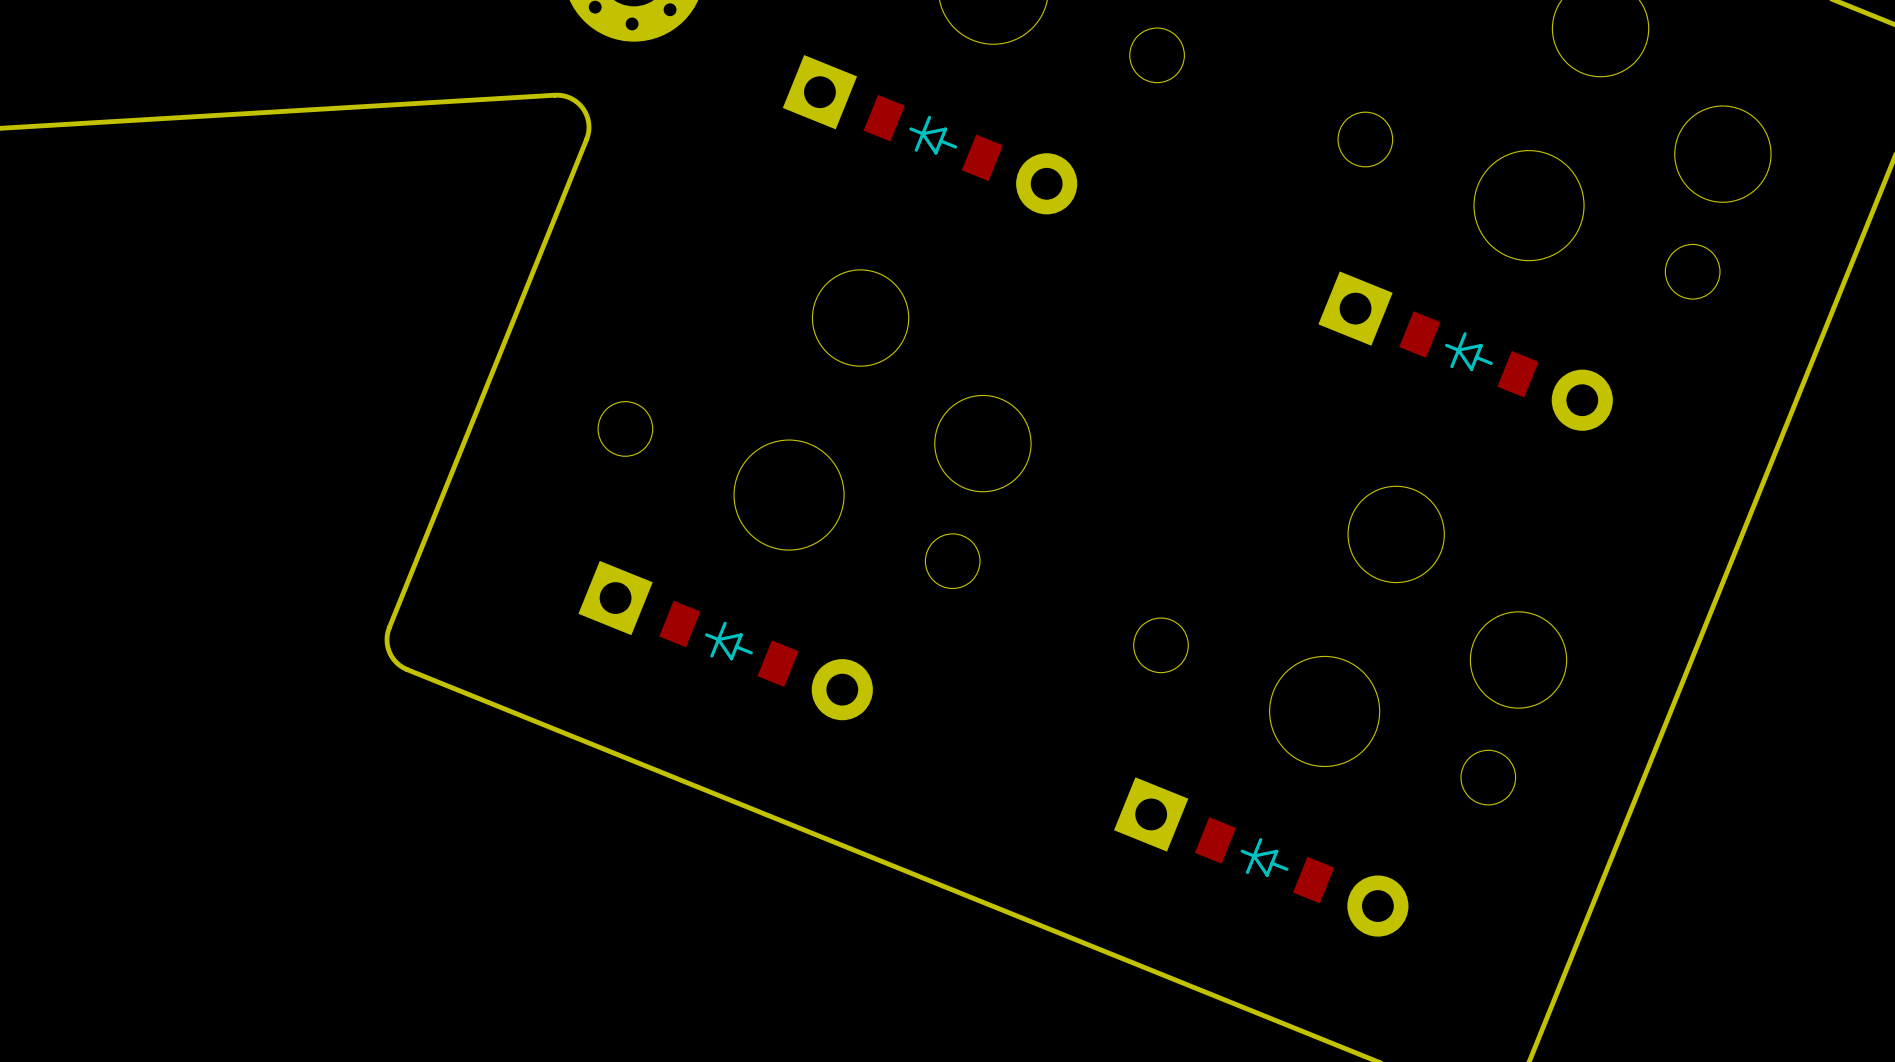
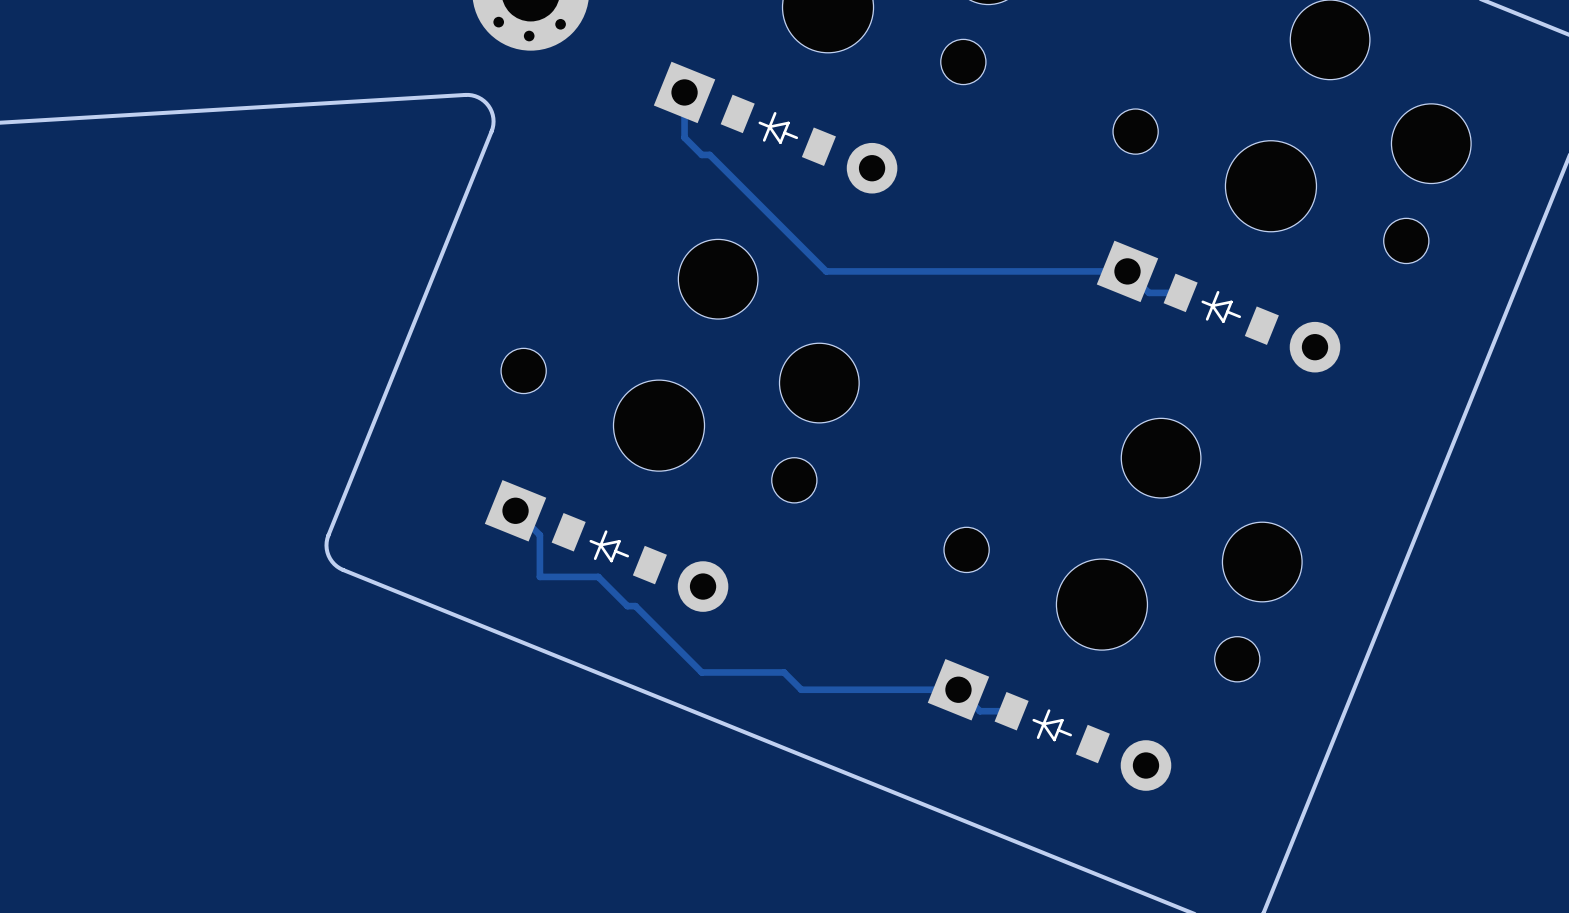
track: none -> (684, 92) (684, 137) (701, 154) (709, 154) (826, 271) (1127, 271) (1148, 292) (1180, 292)
track: none -> (515, 510) (539, 535) (539, 576) (598, 576) (627, 606) (635, 606) (701, 672) (784, 672) (801, 689) (958, 689) (979, 711) (1011, 711)

